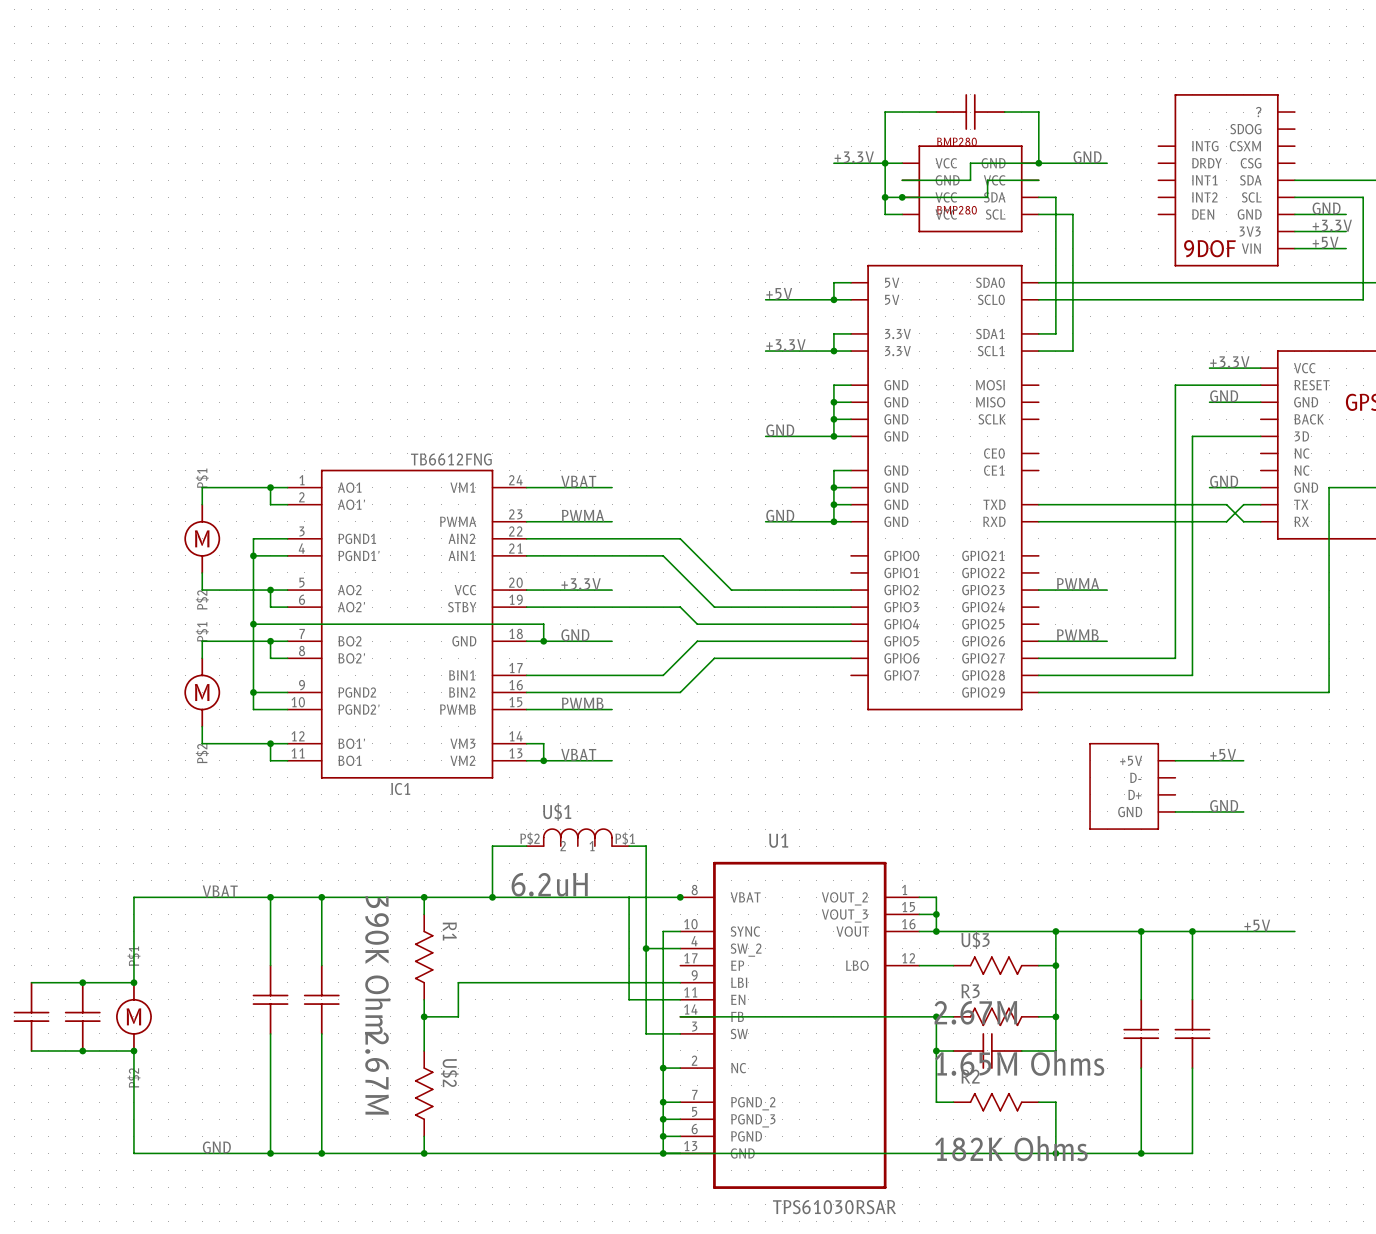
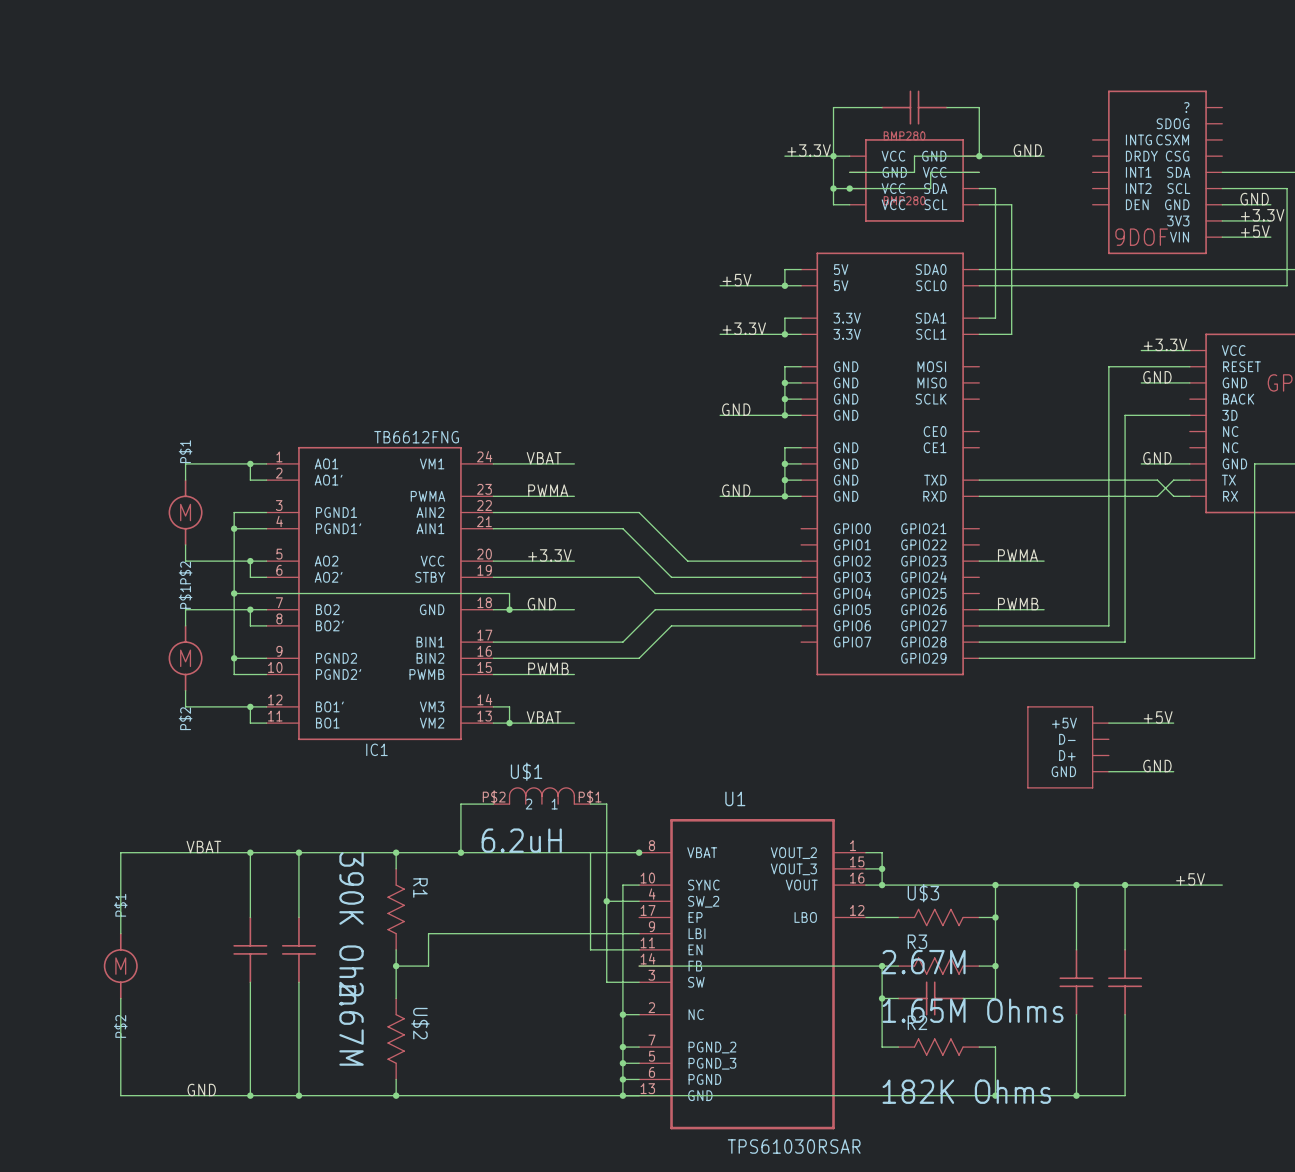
wire: (31, 982) (133, 982) -> none
junction: (82, 982) -> none
junction: (133, 982) -> none
part: (31, 1016) -> none
part: (82, 1016) -> none
wire: (31, 1050) (133, 1050) -> none
junction: (82, 1050) -> none
junction: (133, 1050) -> none

